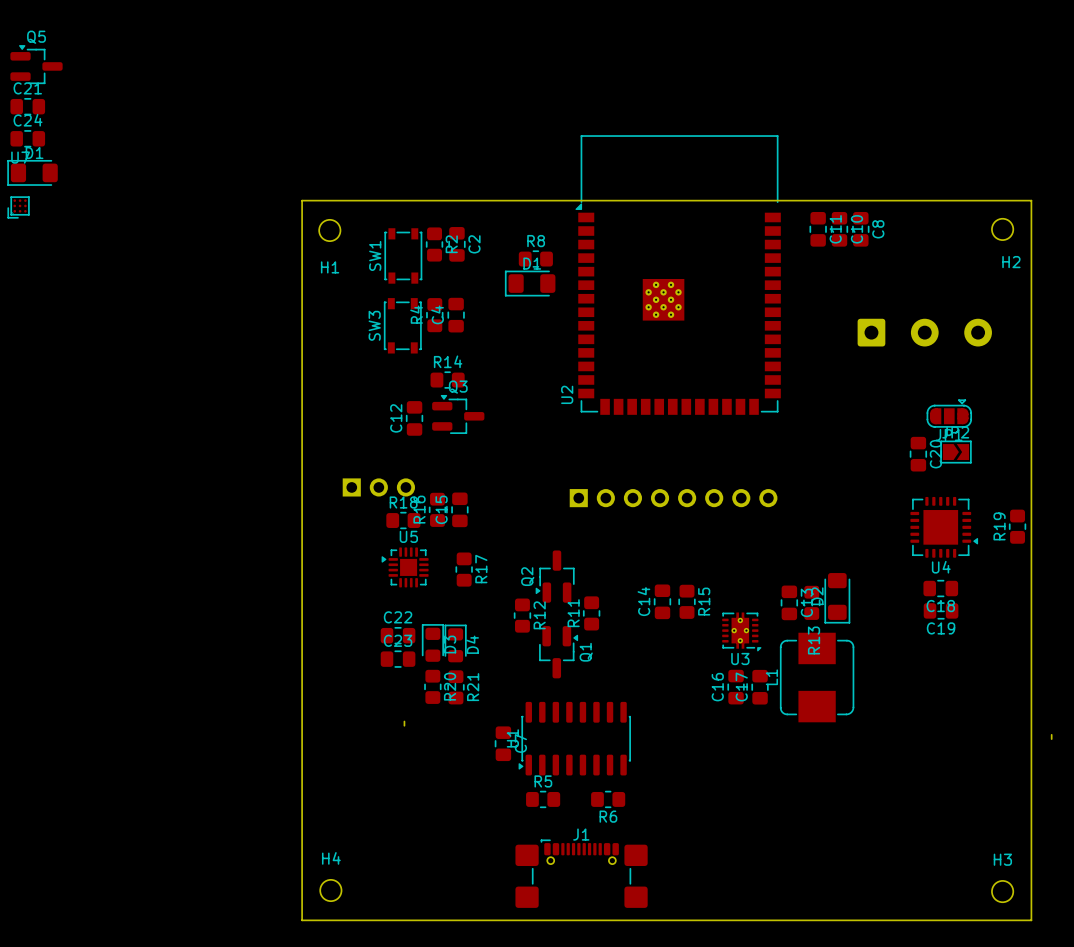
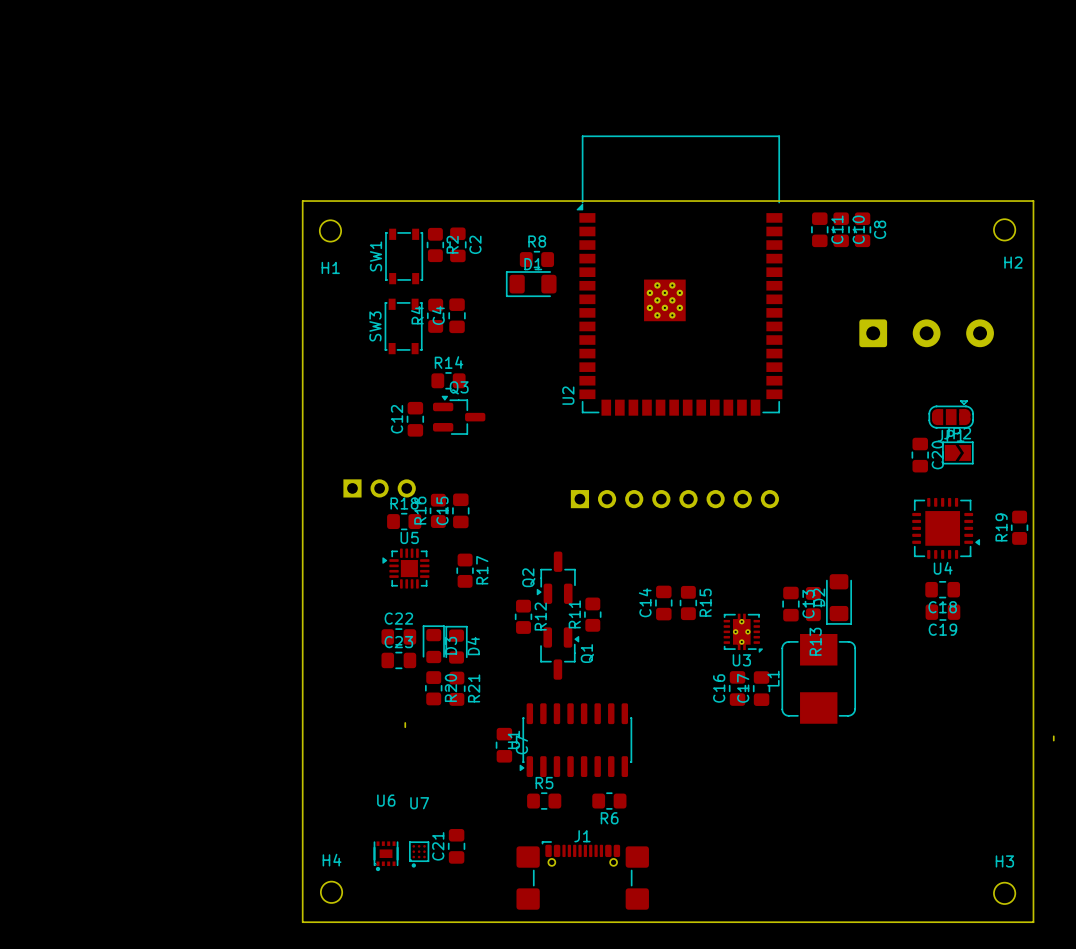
Q5: (36, 64) -> none
C21 name position: C21 (27, 88) -> C21 (438, 846)
C21 rotation: 0° (27, 106) -> 90° clockwise (456, 846)
C21 position: (27, 106) -> (456, 846)
C24: (27, 138) -> none
D1: (32, 172) -> none
U7 footprint: [7, 196, 30, 219] -> [409, 841, 430, 868]
U6: none -> (386, 856)

